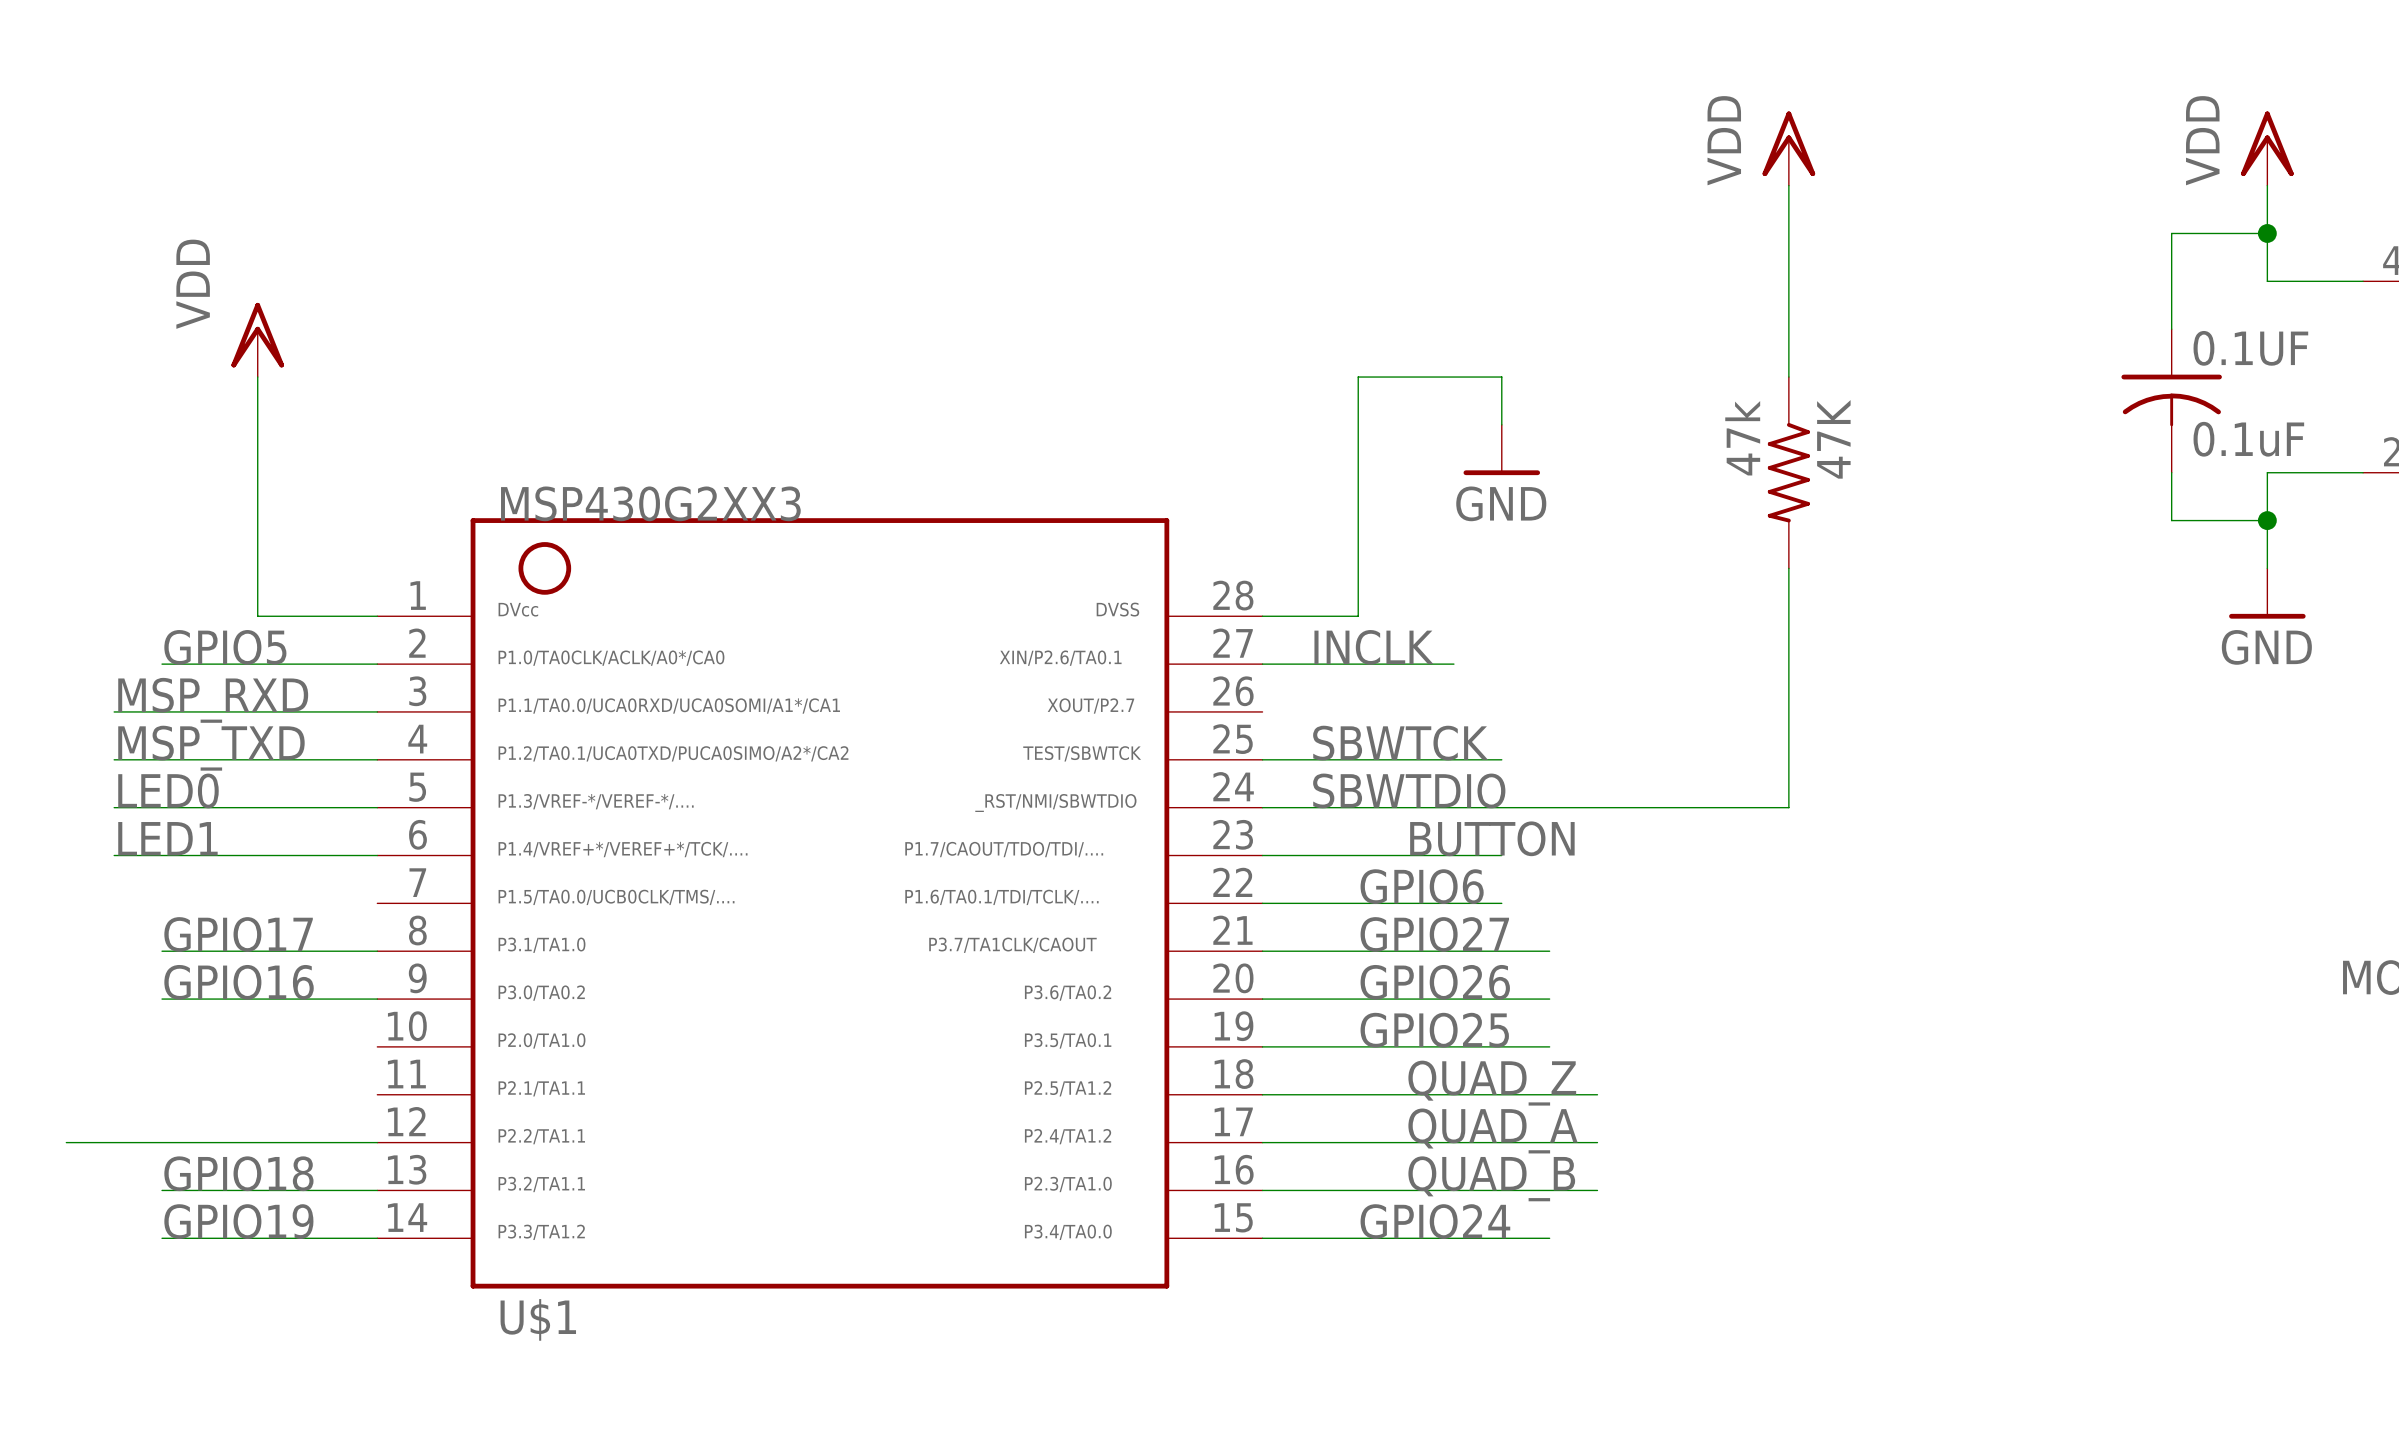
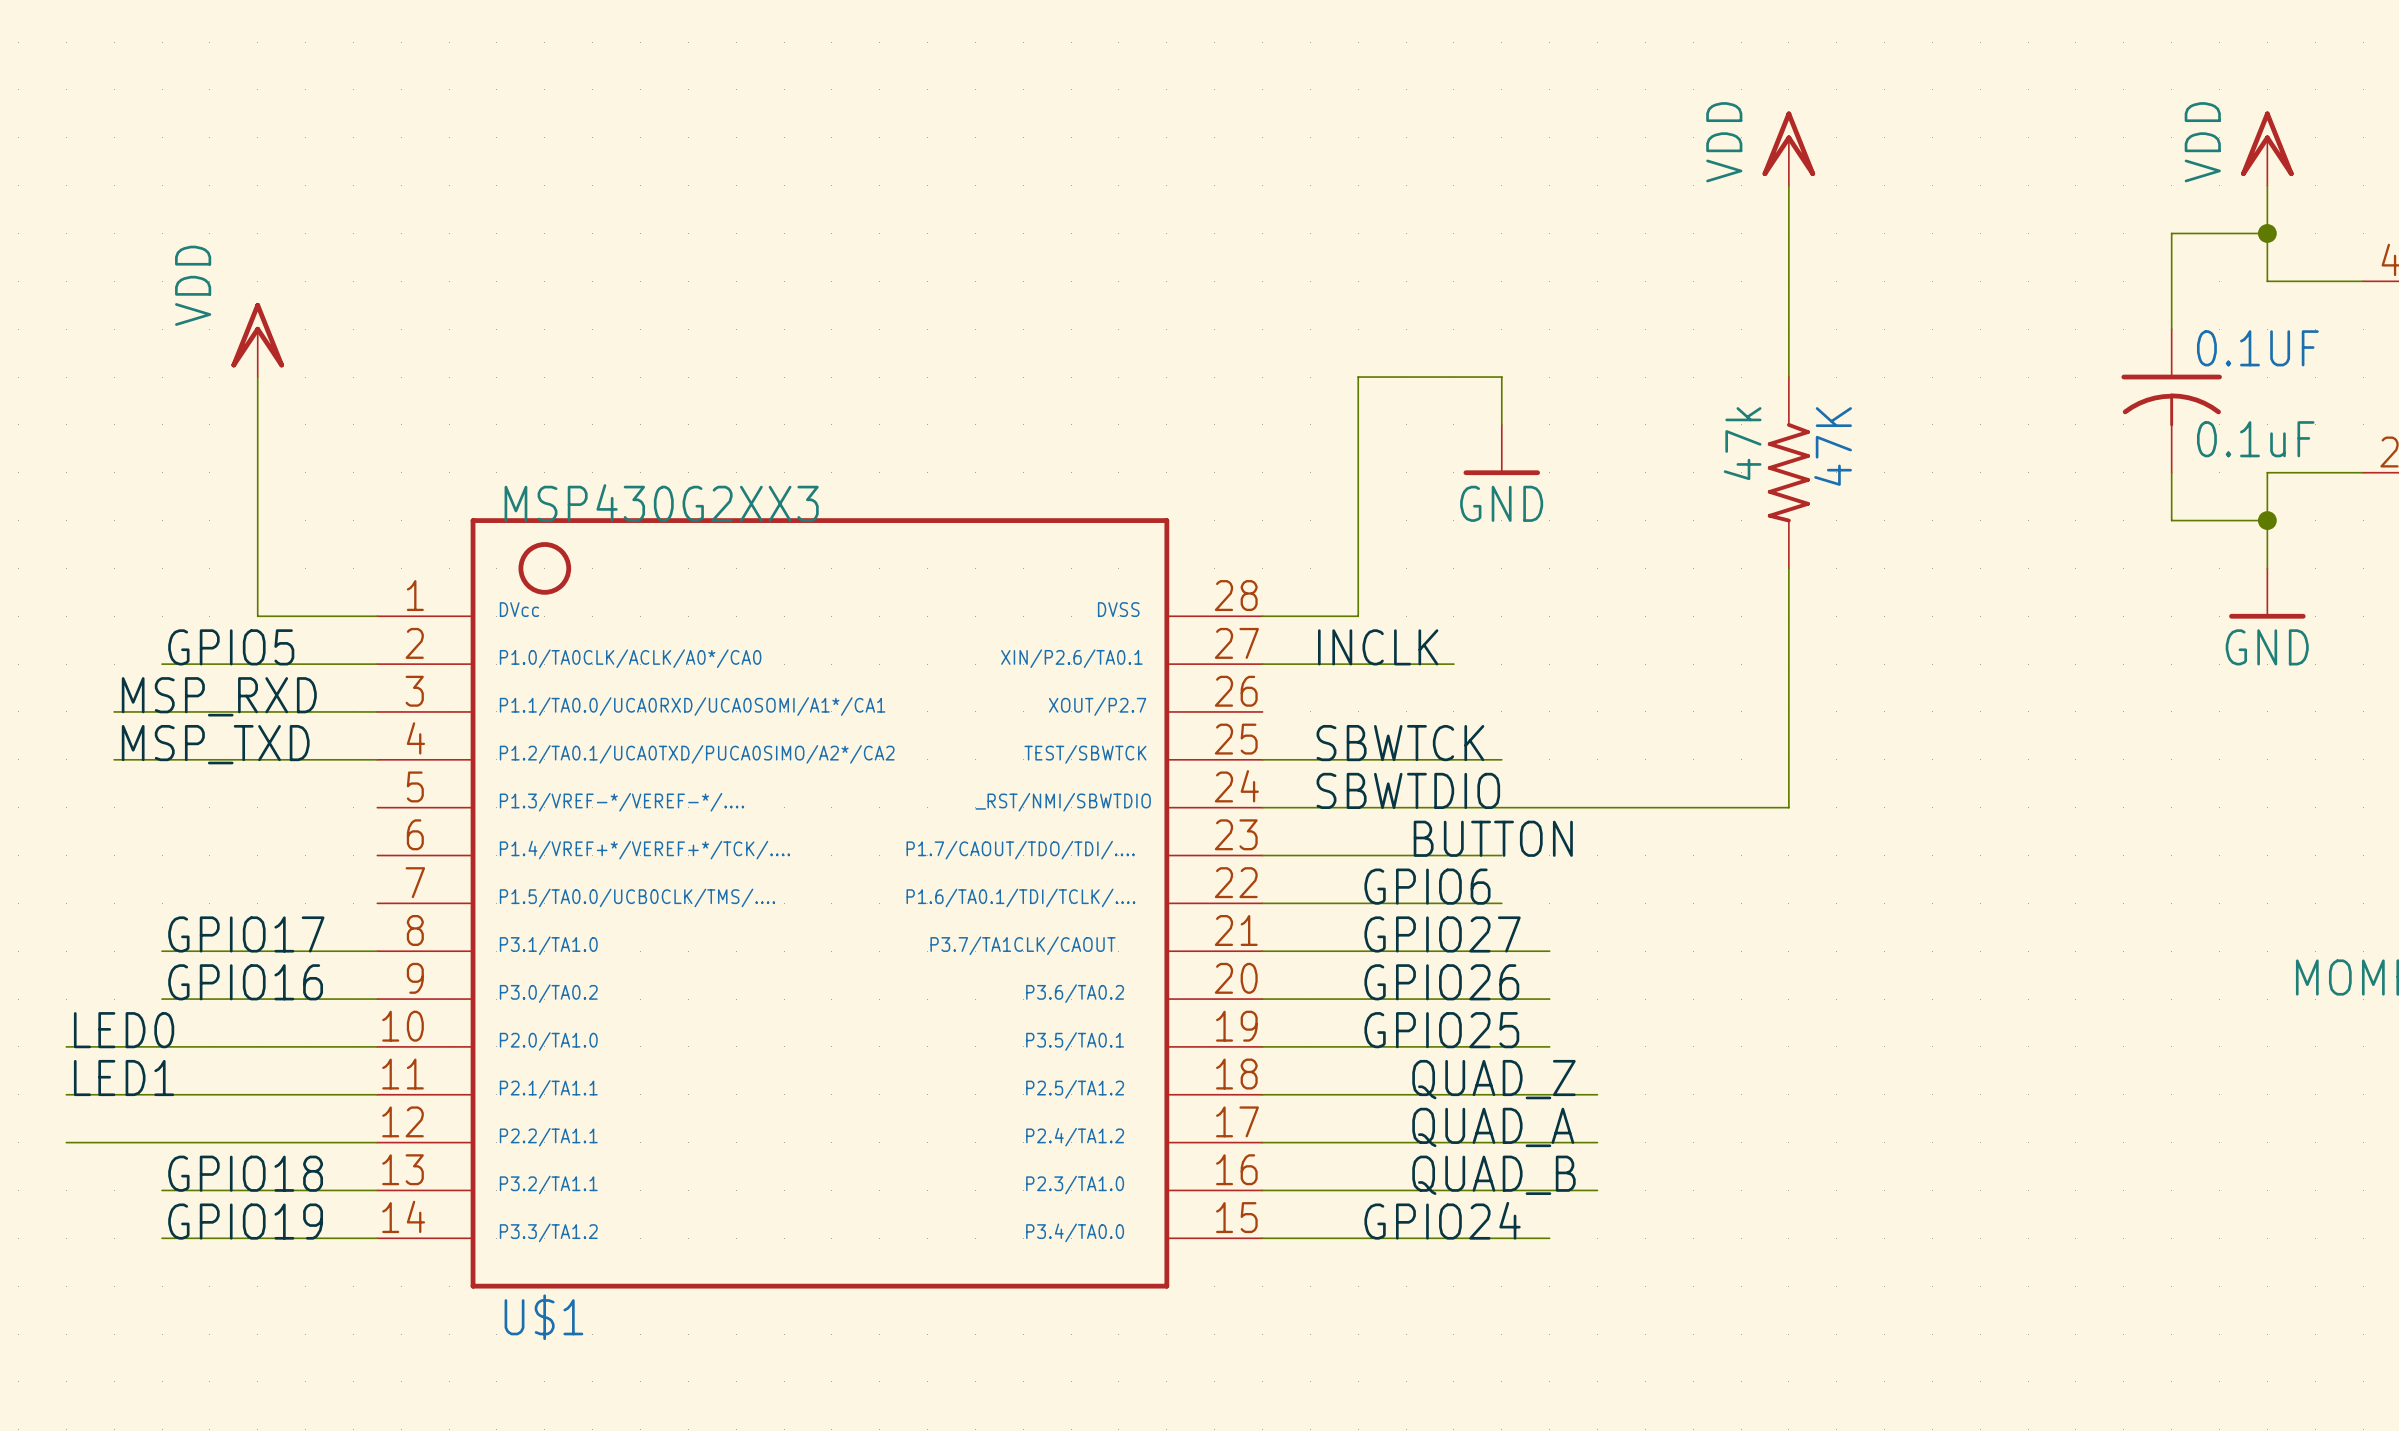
label position: LED0 (168, 790) -> LED0 (124, 1030)
wire: (114, 807) (377, 807) -> none
label position: LED1 (167, 838) -> LED1 (124, 1078)
wire: (114, 855) (377, 855) -> none
wire: none -> (66, 1046) (377, 1046)
wire: none -> (66, 1094) (377, 1094)

